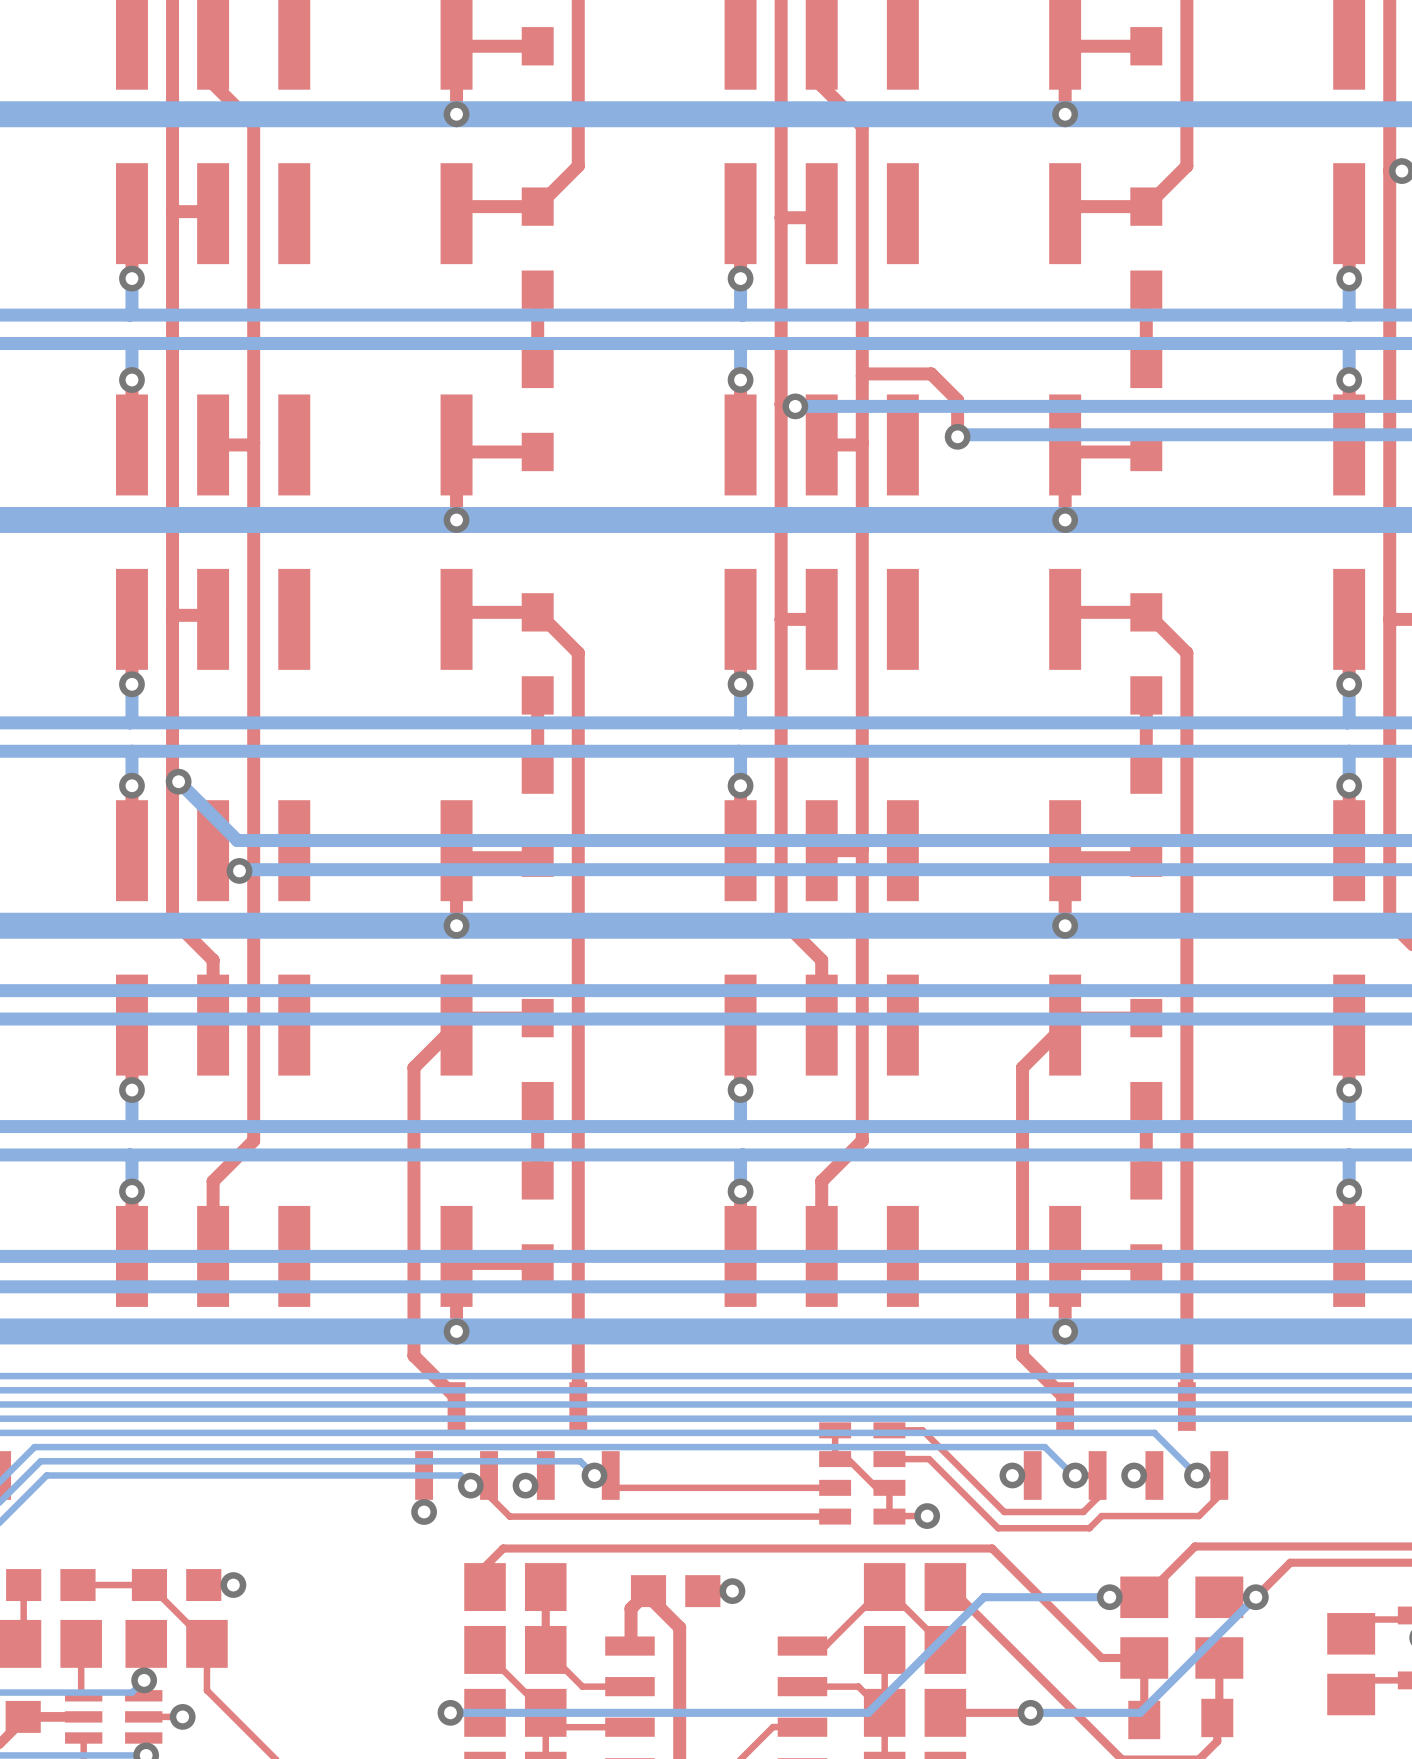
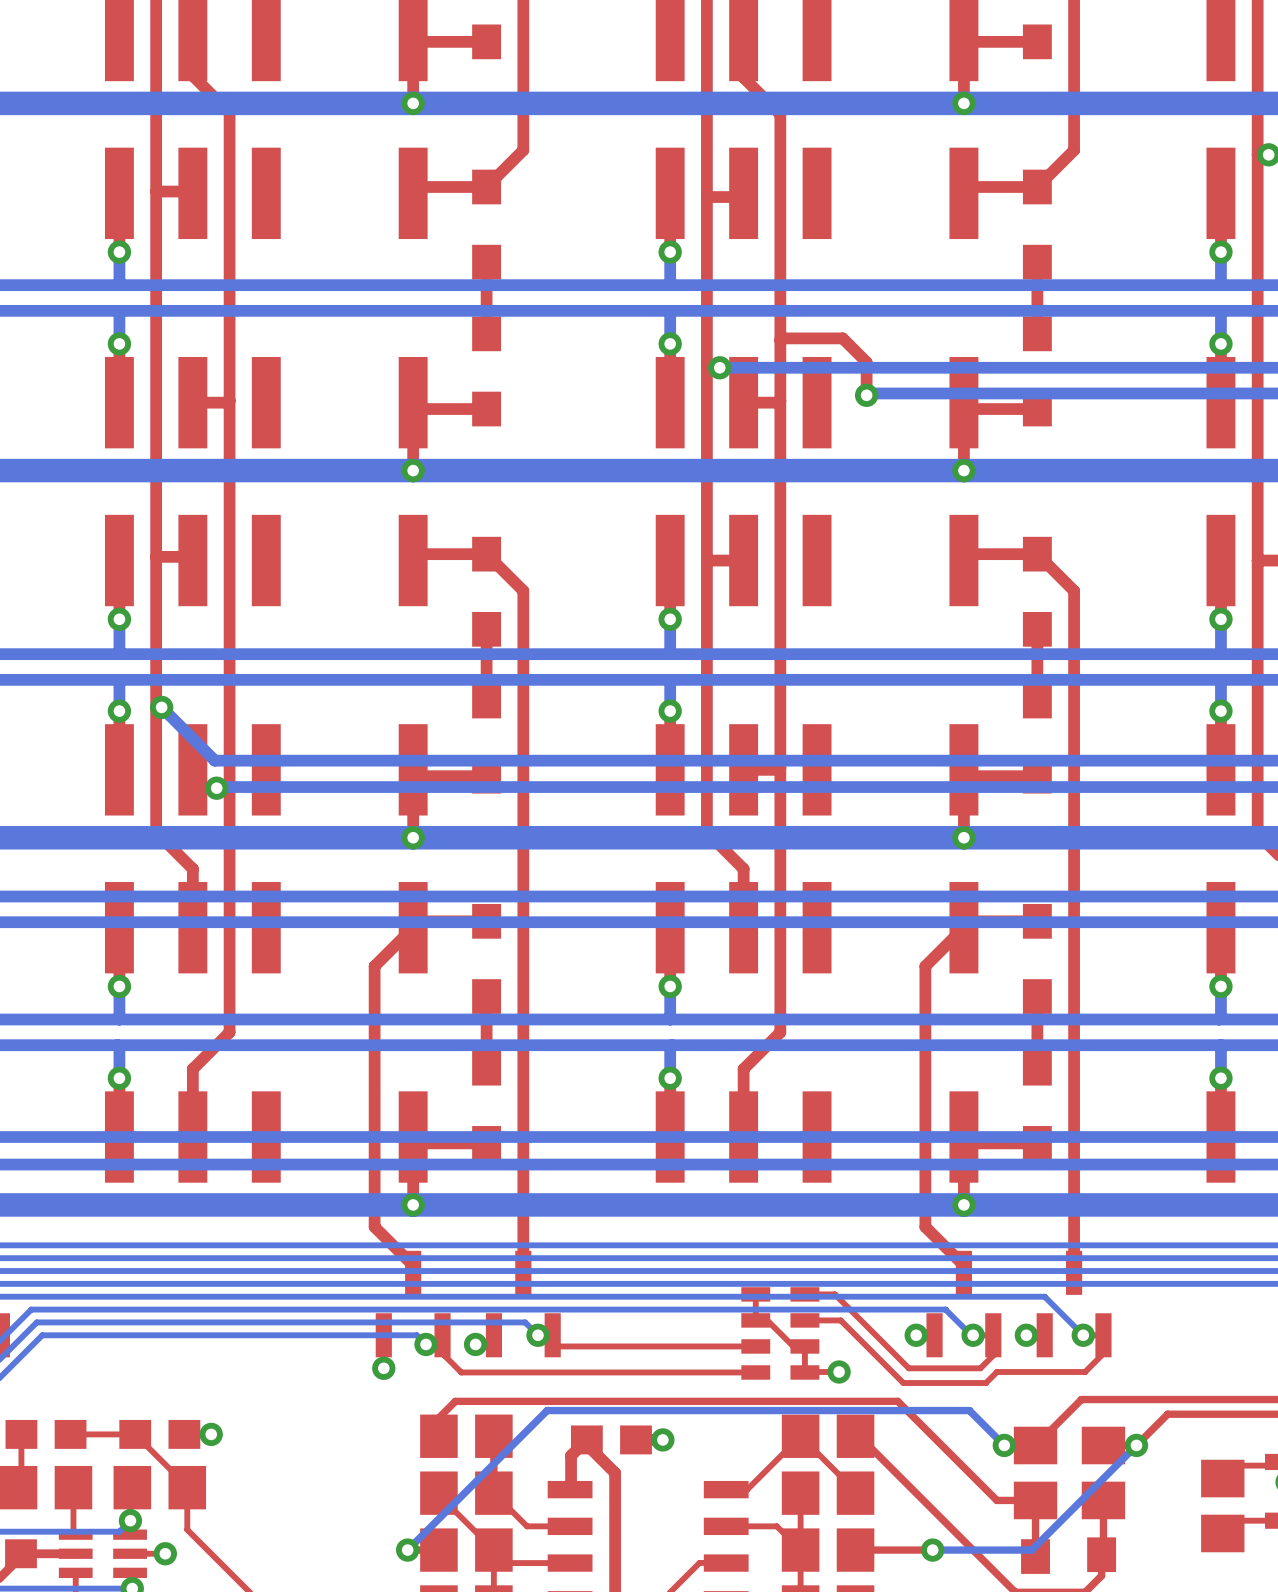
bottom track: (1109, 1597) (984, 1597) (868, 1712) (450, 1712) -> (1004, 1445) (969, 1410) (547, 1410) (407, 1550)

